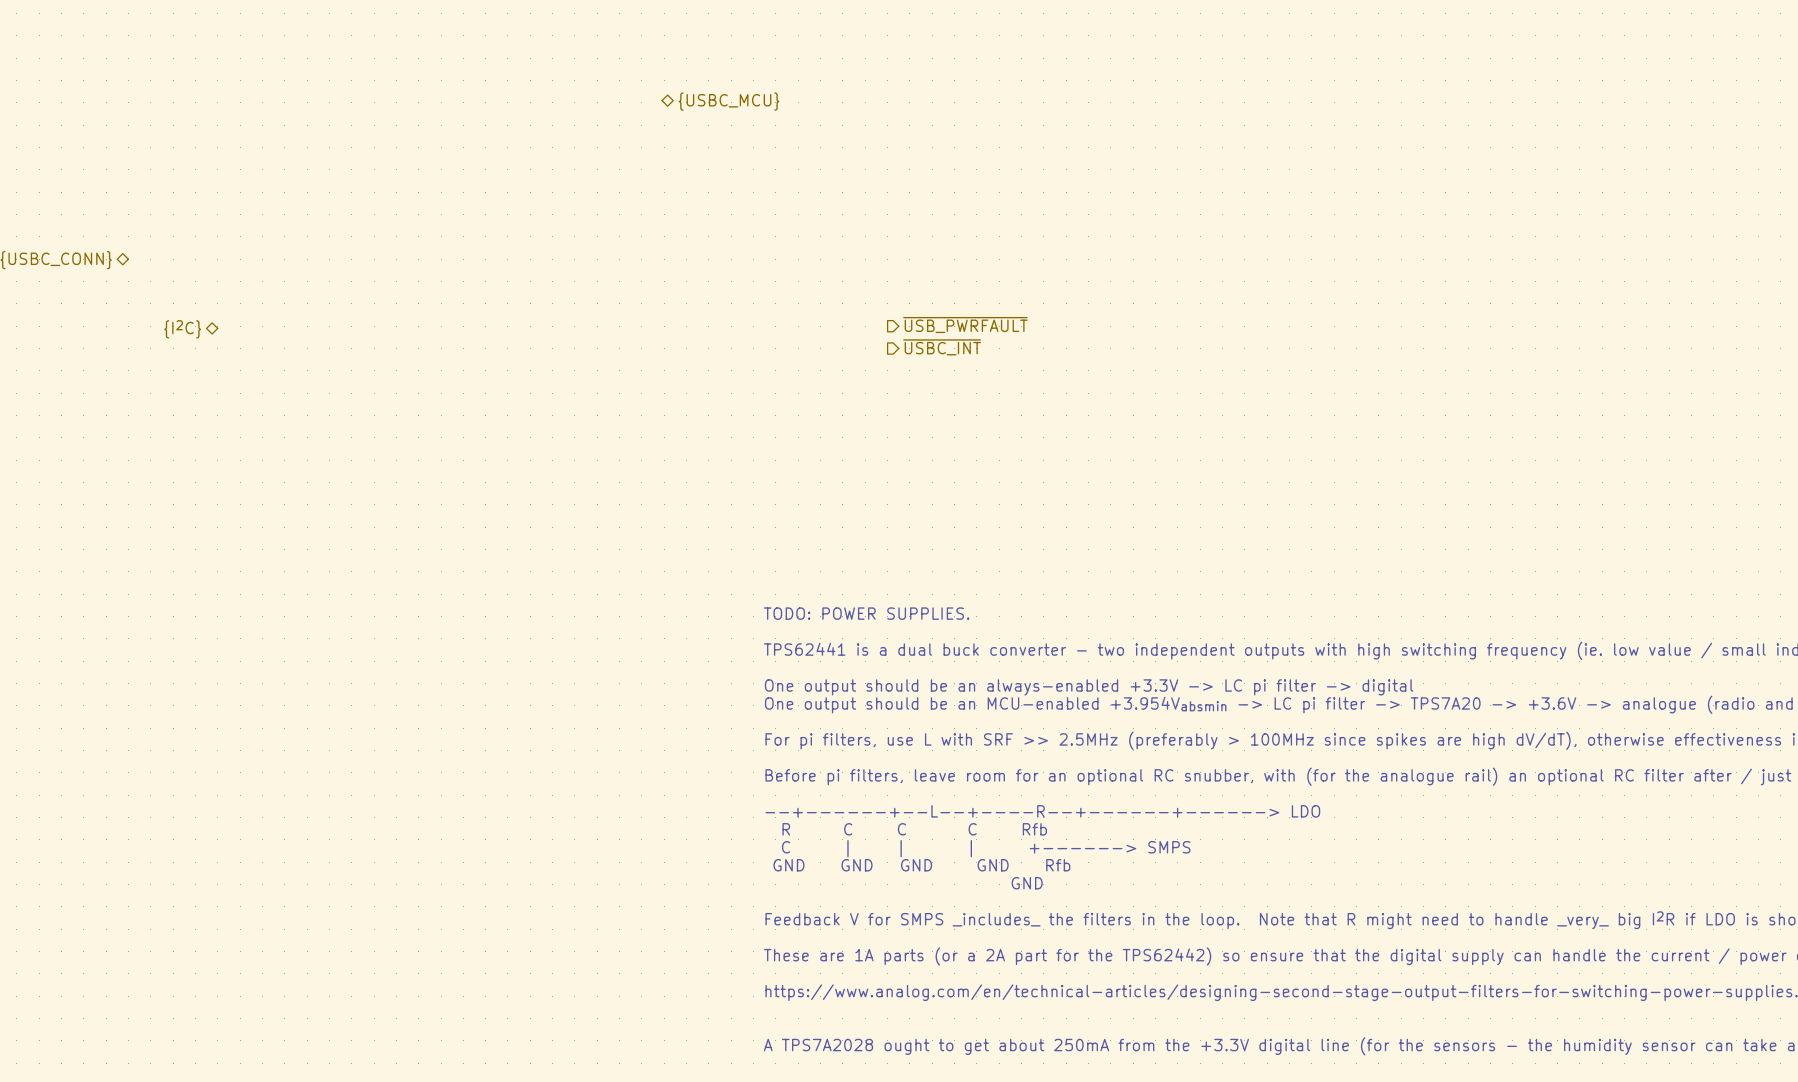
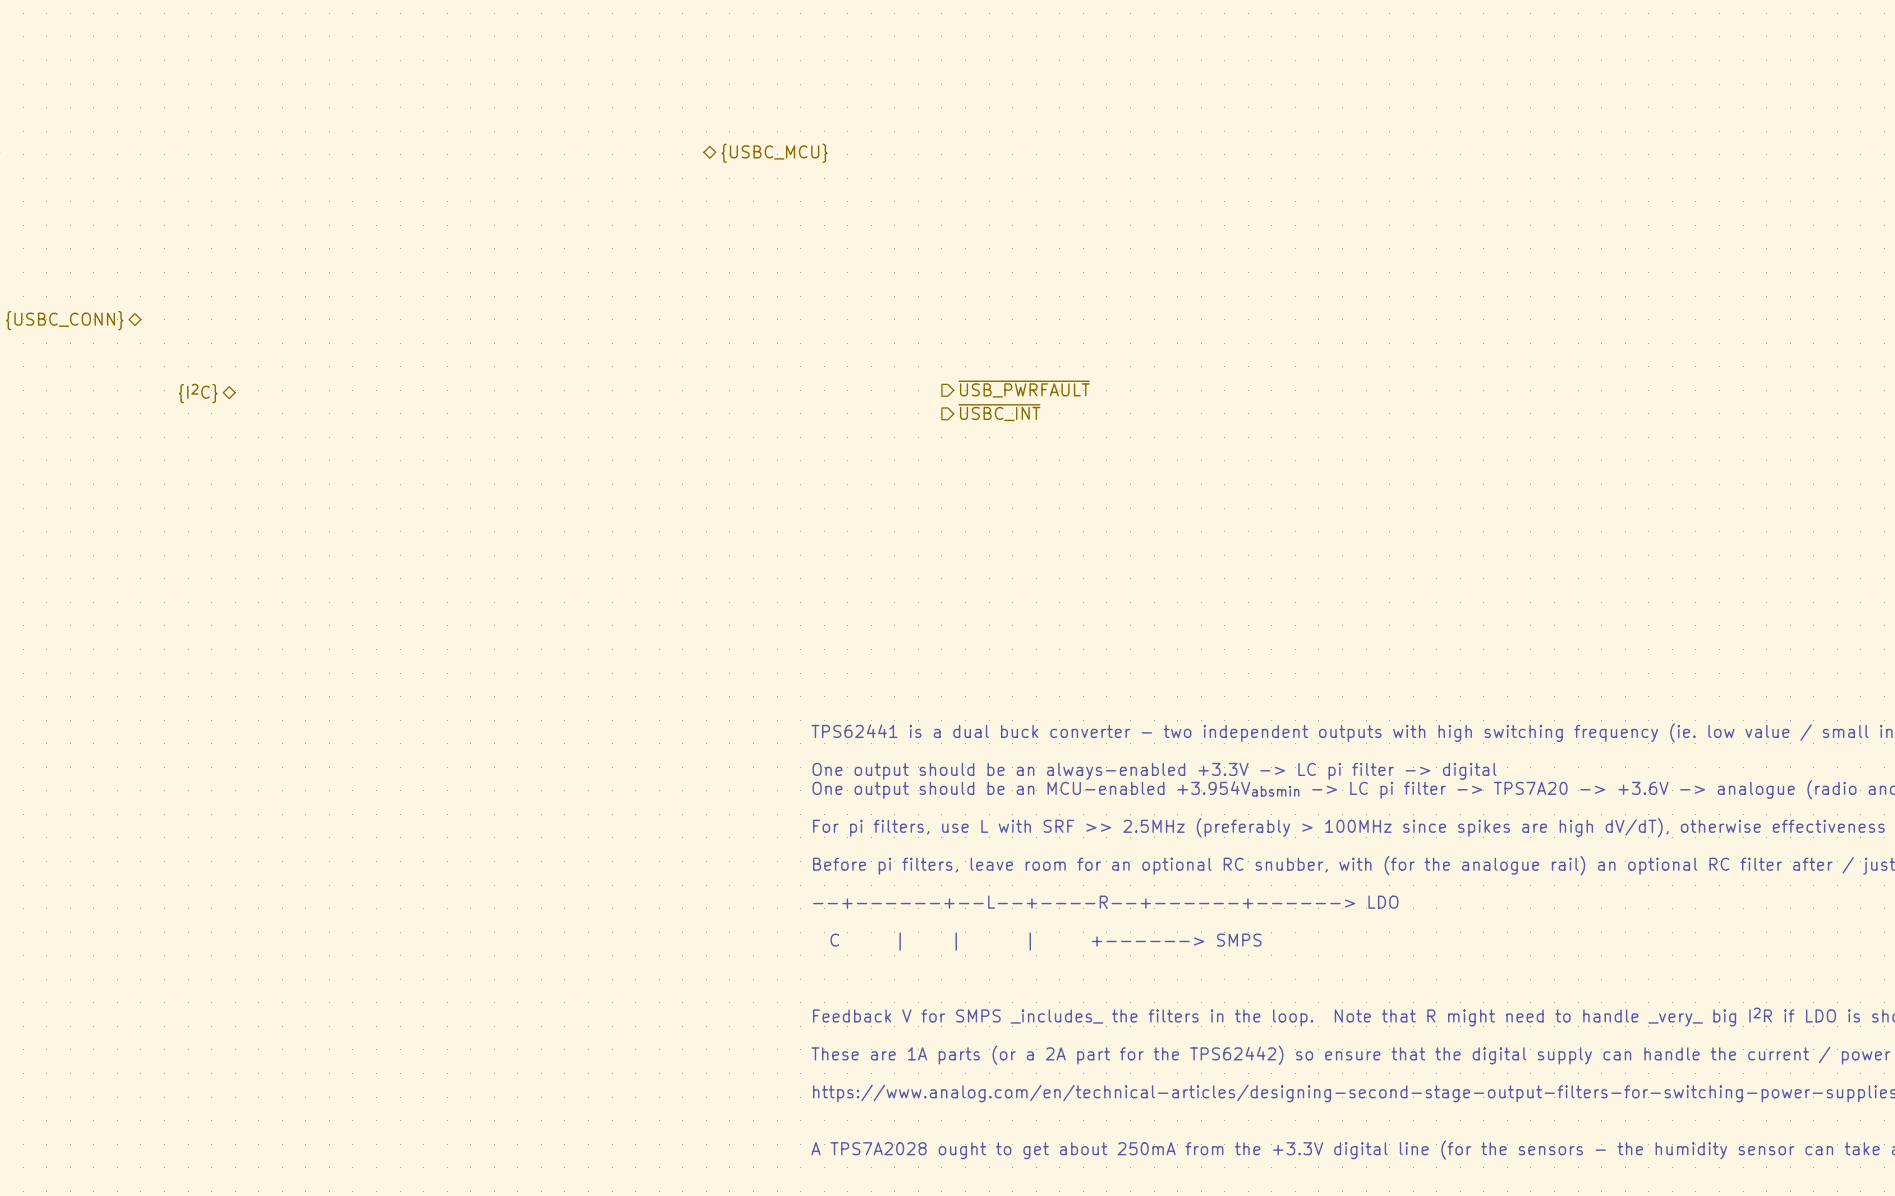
text: TODO: POWER SUPPLIES. (866, 613) -> none
text: R C C C Rfb (914, 829) -> none
text: GND GND GND GND Rfb (921, 865) -> none
text: GND (1027, 883) -> none

